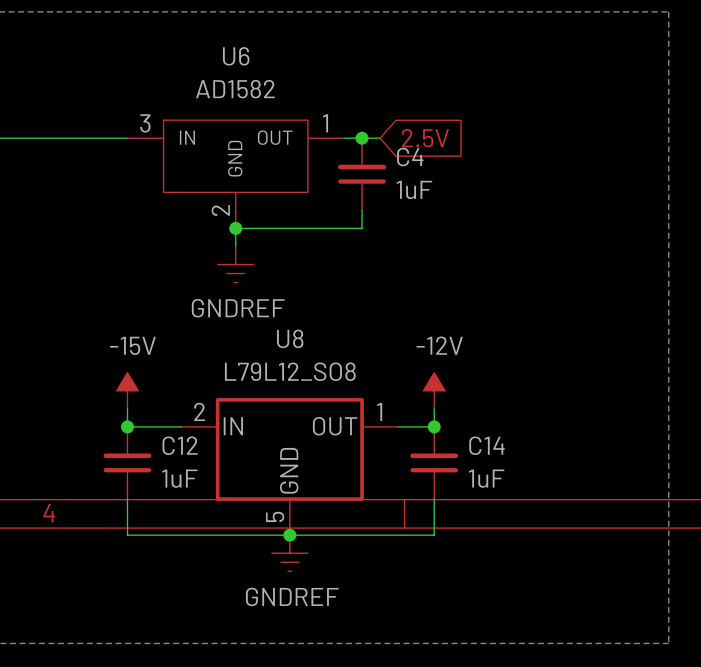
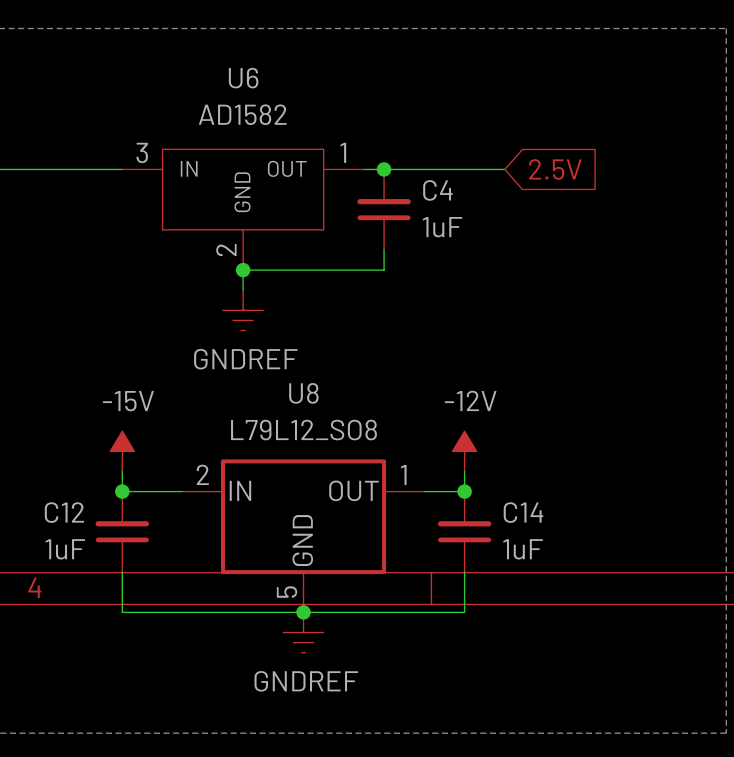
wire: none -> (404, 169) (504, 169)
global label position: 2.5V (425, 138) -> 2.5V (555, 169)
C12 name position: C12 (180, 445) -> C12 (64, 512)
C12 value position: 1uF (179, 478) -> 1uF (65, 549)

